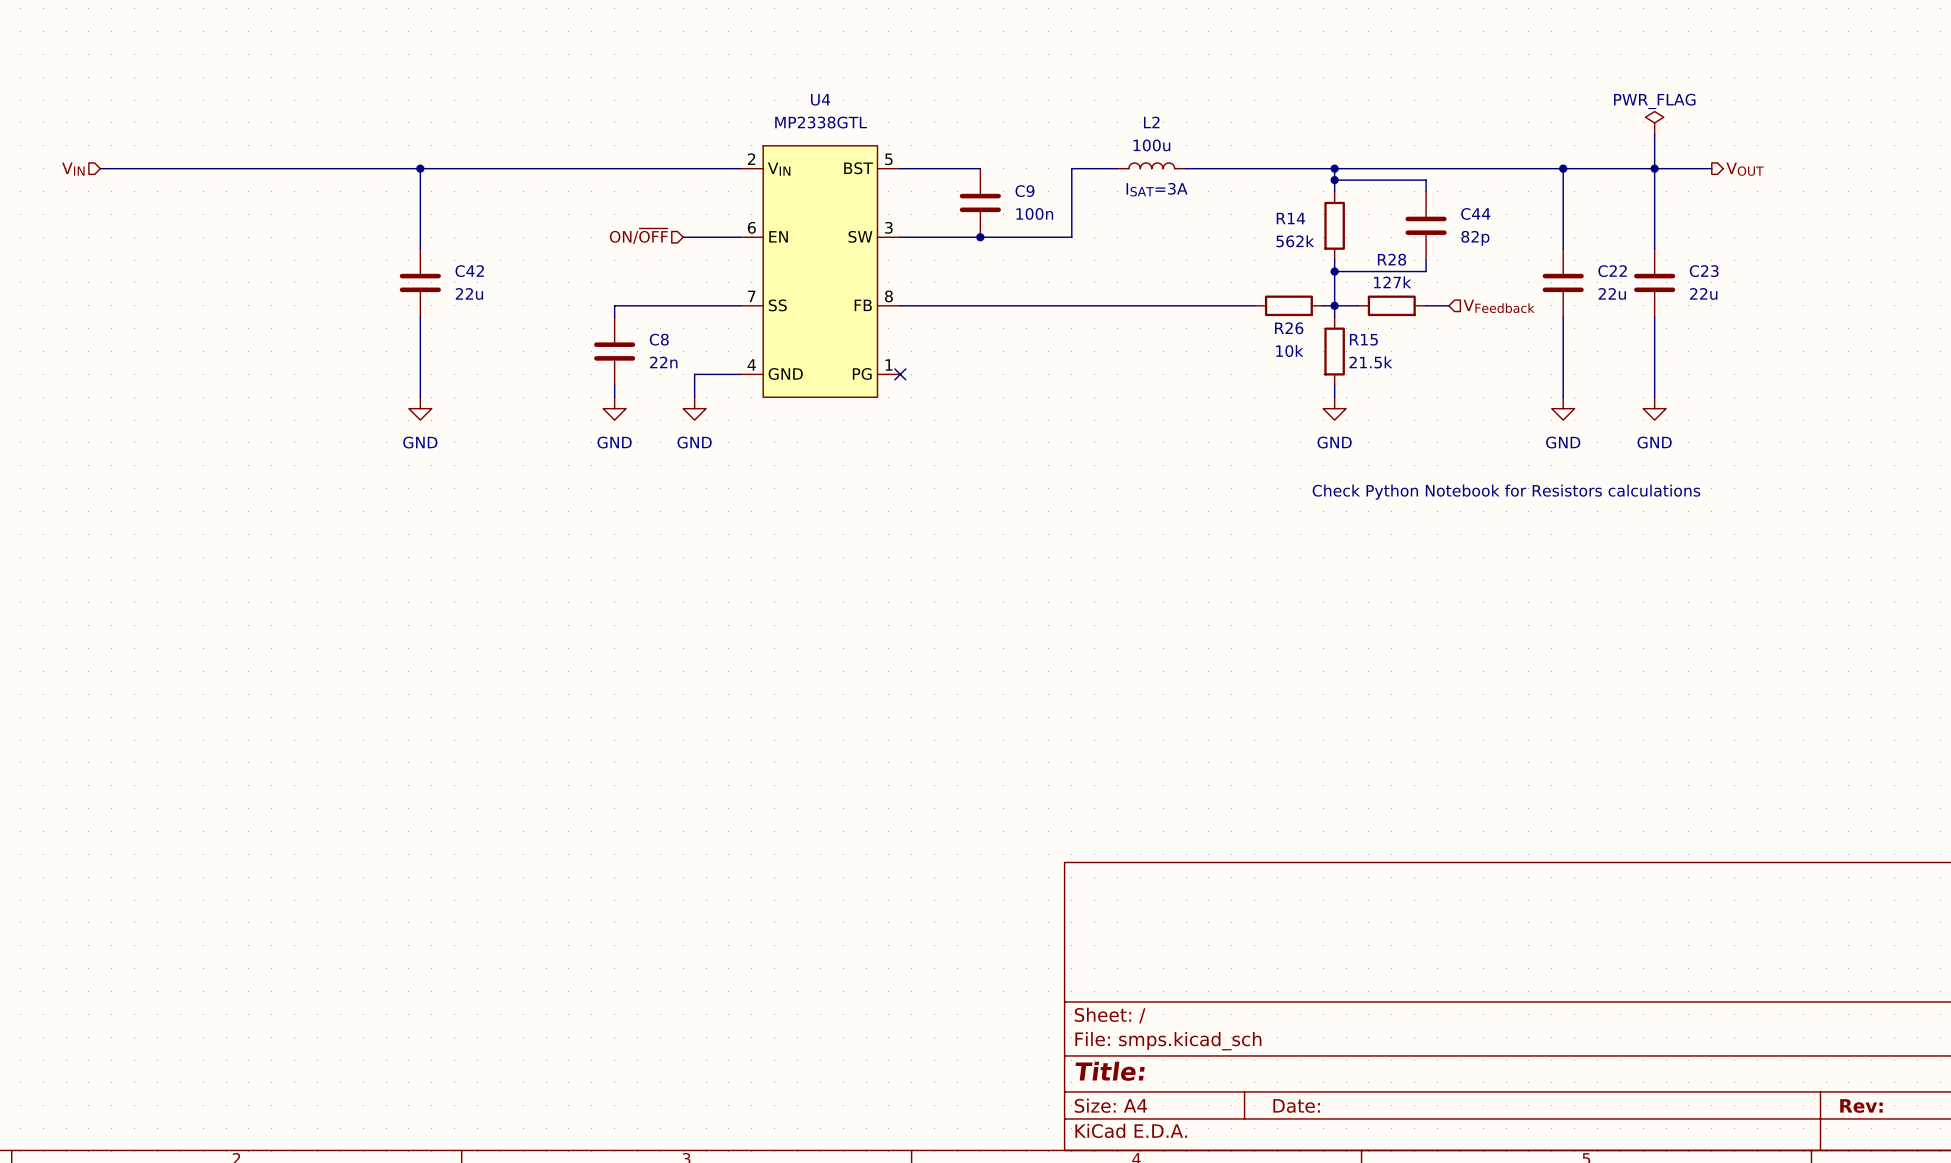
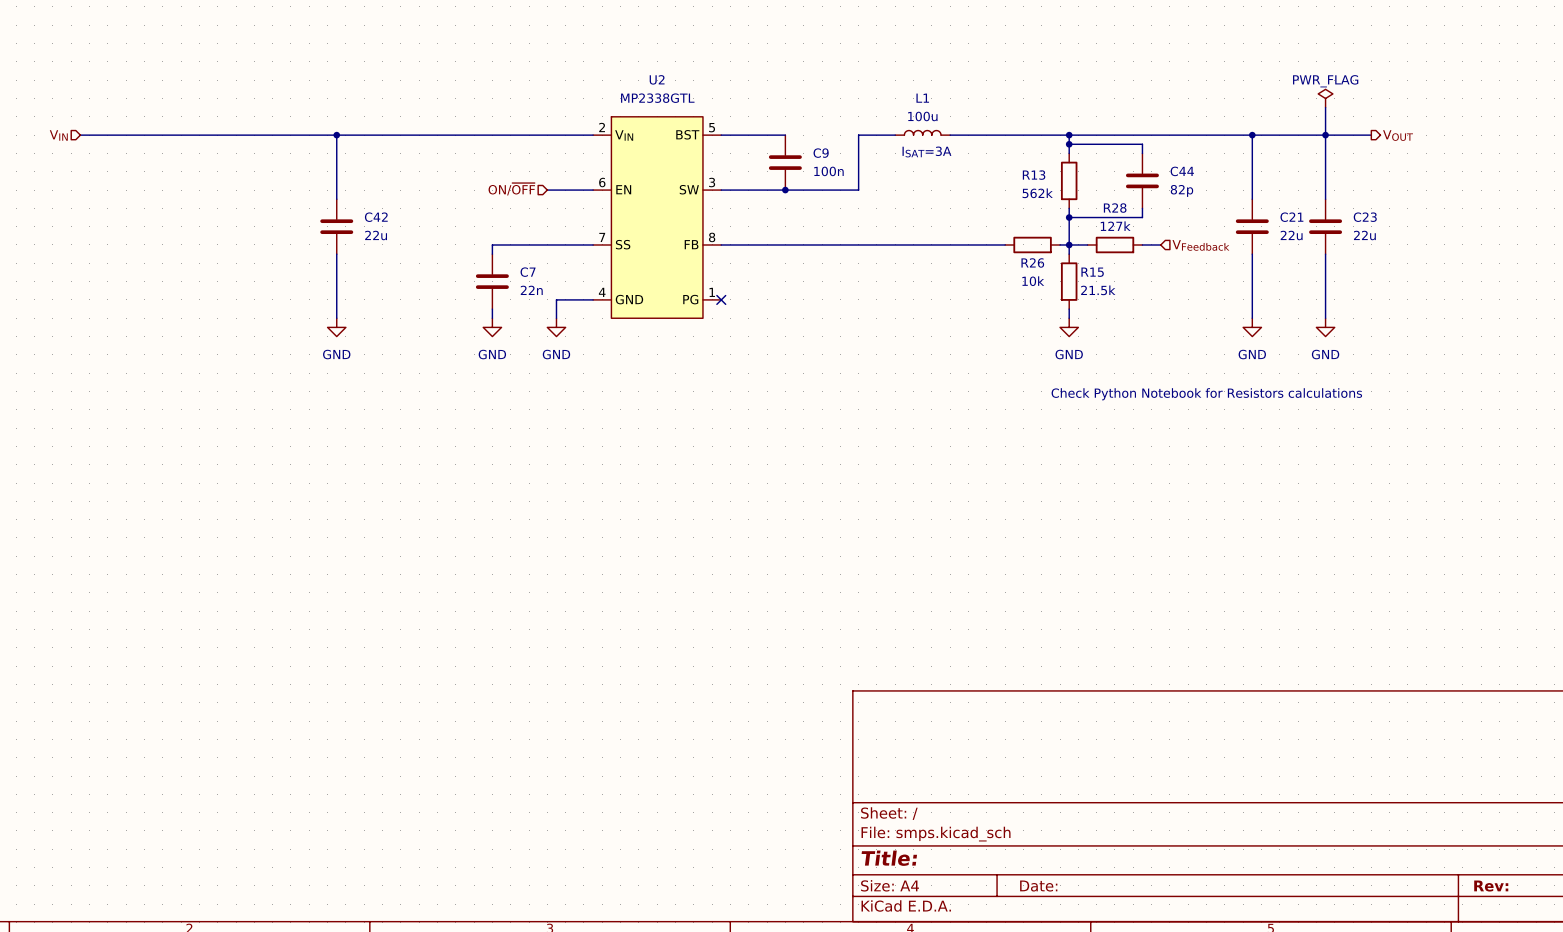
U4 name: U4 (820, 99) -> U2 (657, 79)
L2 name: L2 (1151, 122) -> L1 (922, 98)
R14 name: R14 (1290, 218) -> R13 (1034, 175)
C22 name: C22 (1612, 271) -> C21 (1291, 217)
C8 name: C8 (659, 339) -> C7 (528, 272)

